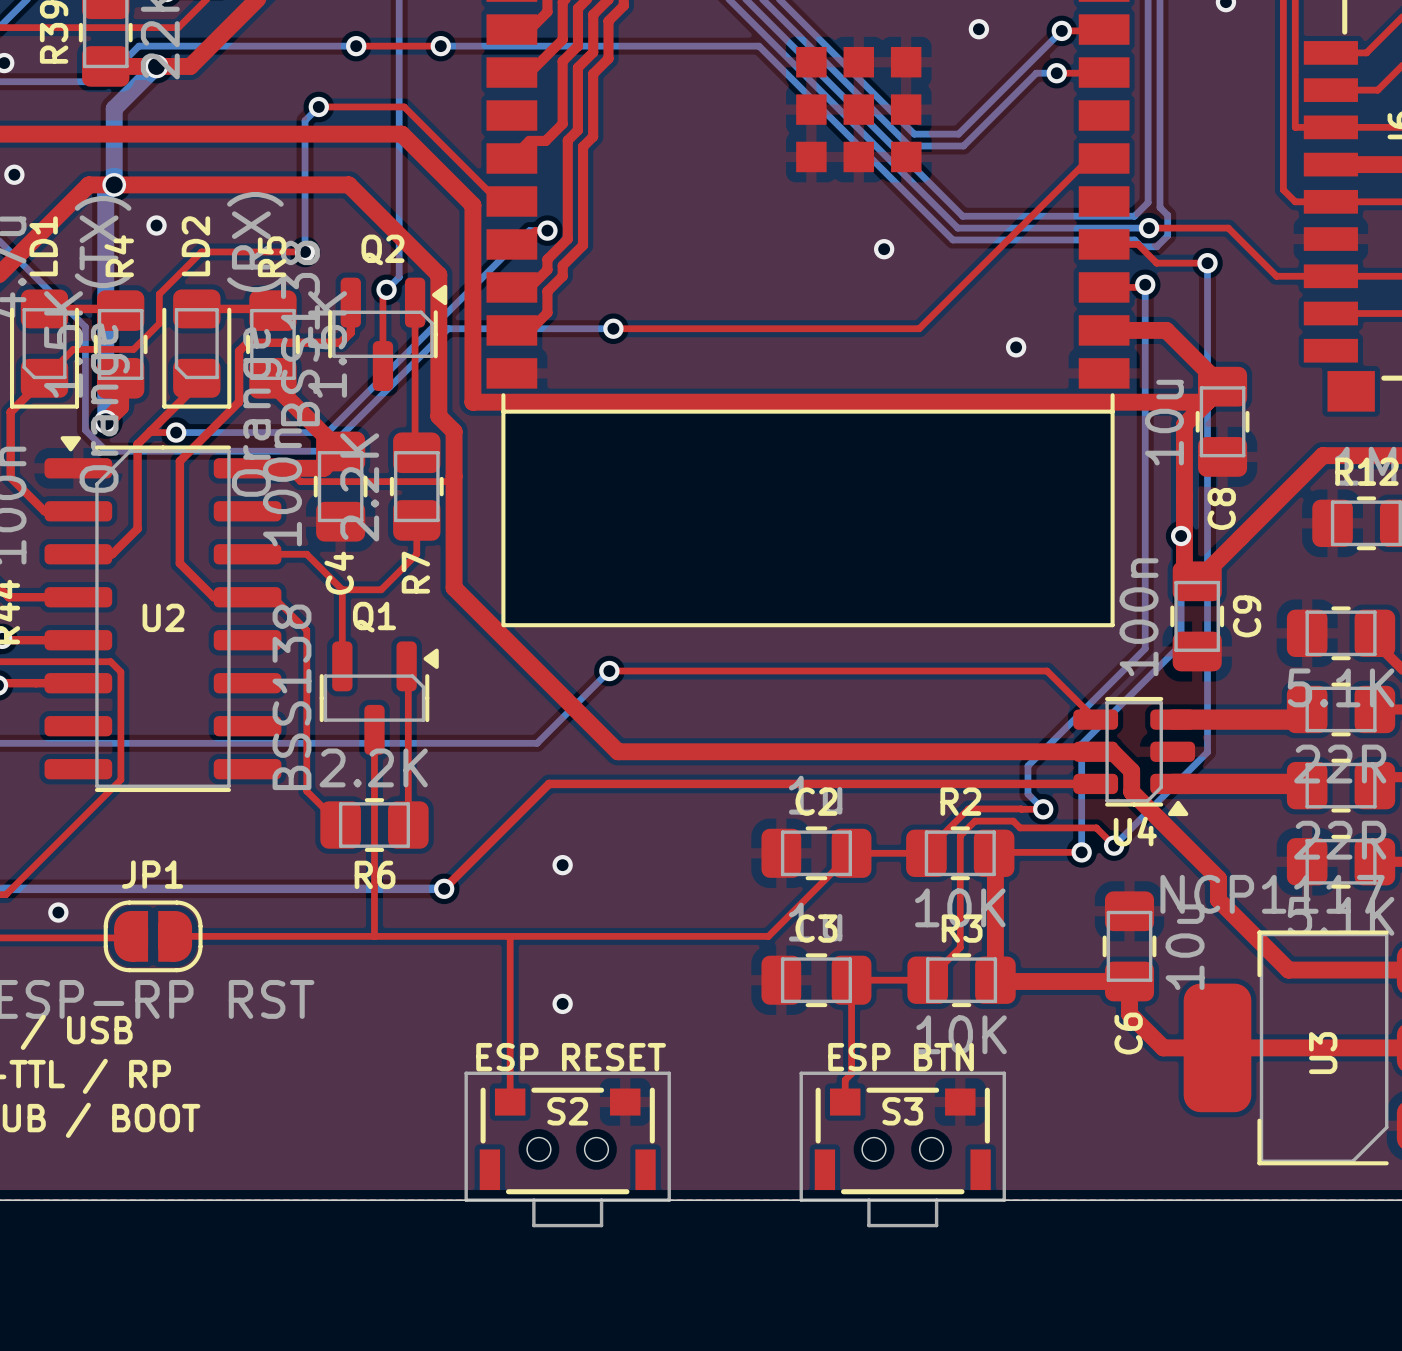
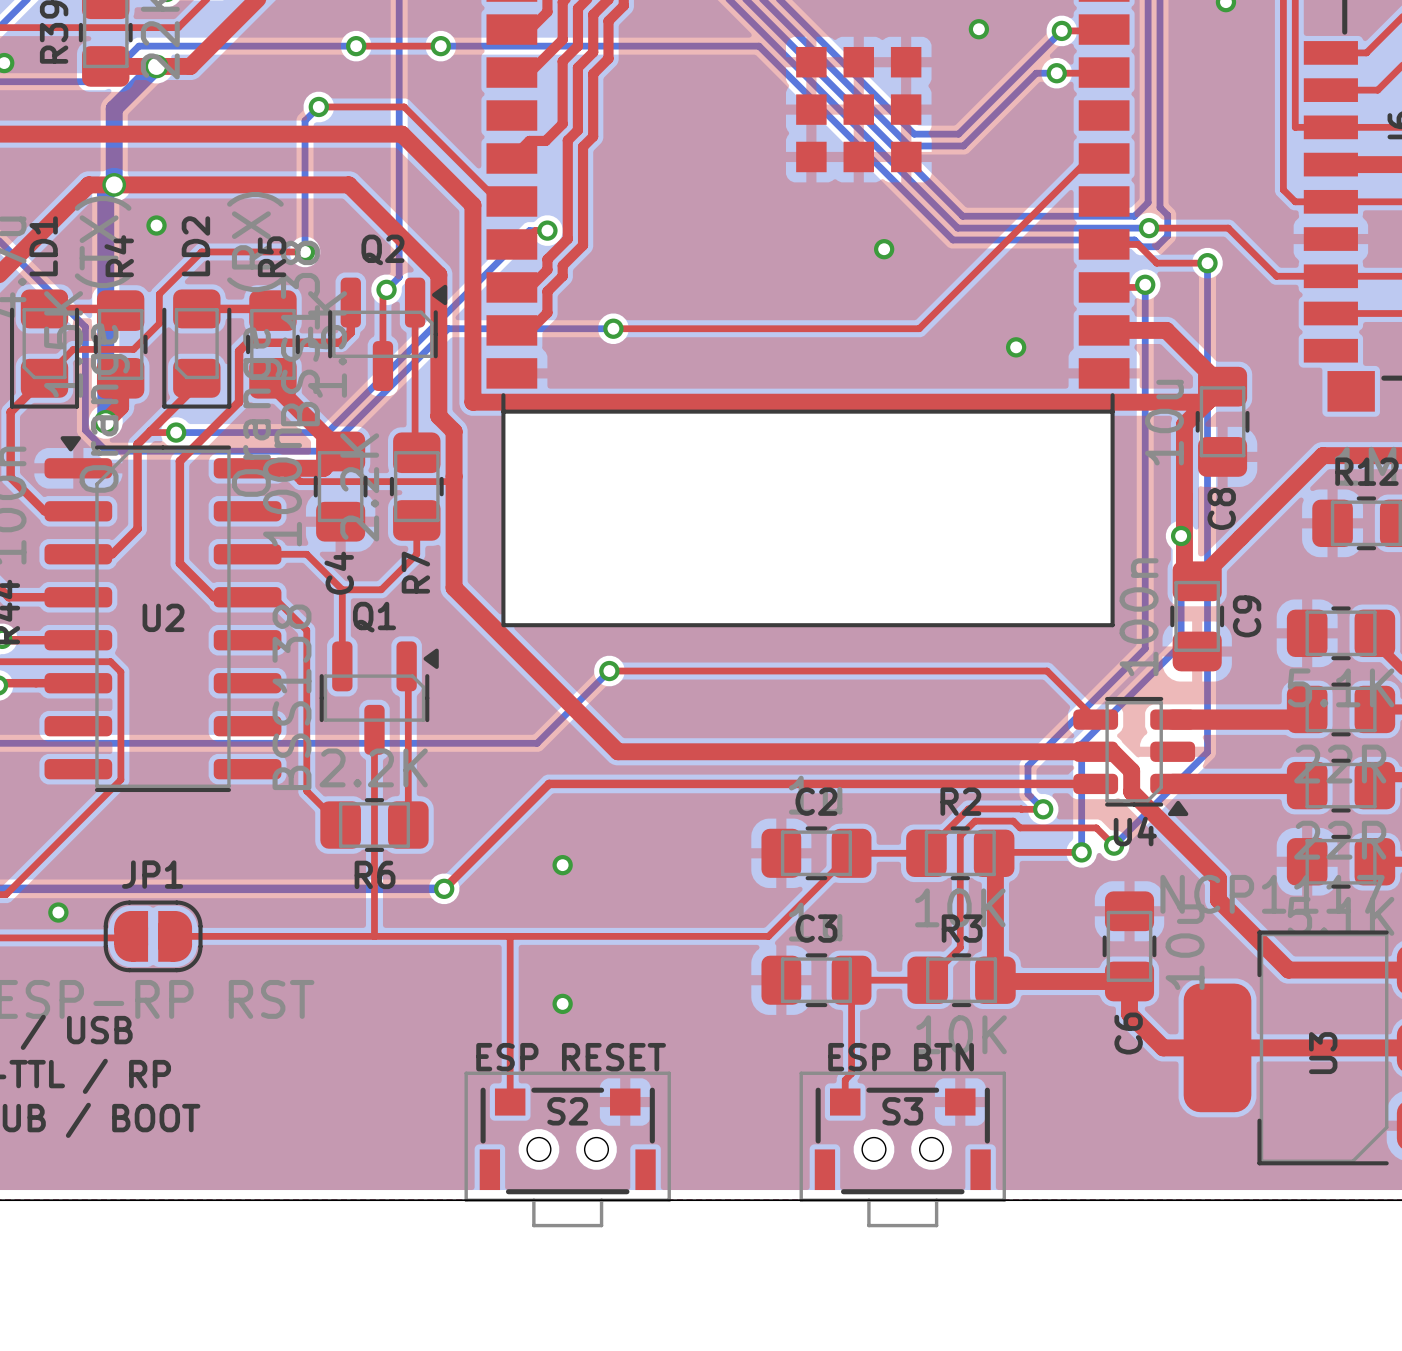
via: (14, 174) -> none

